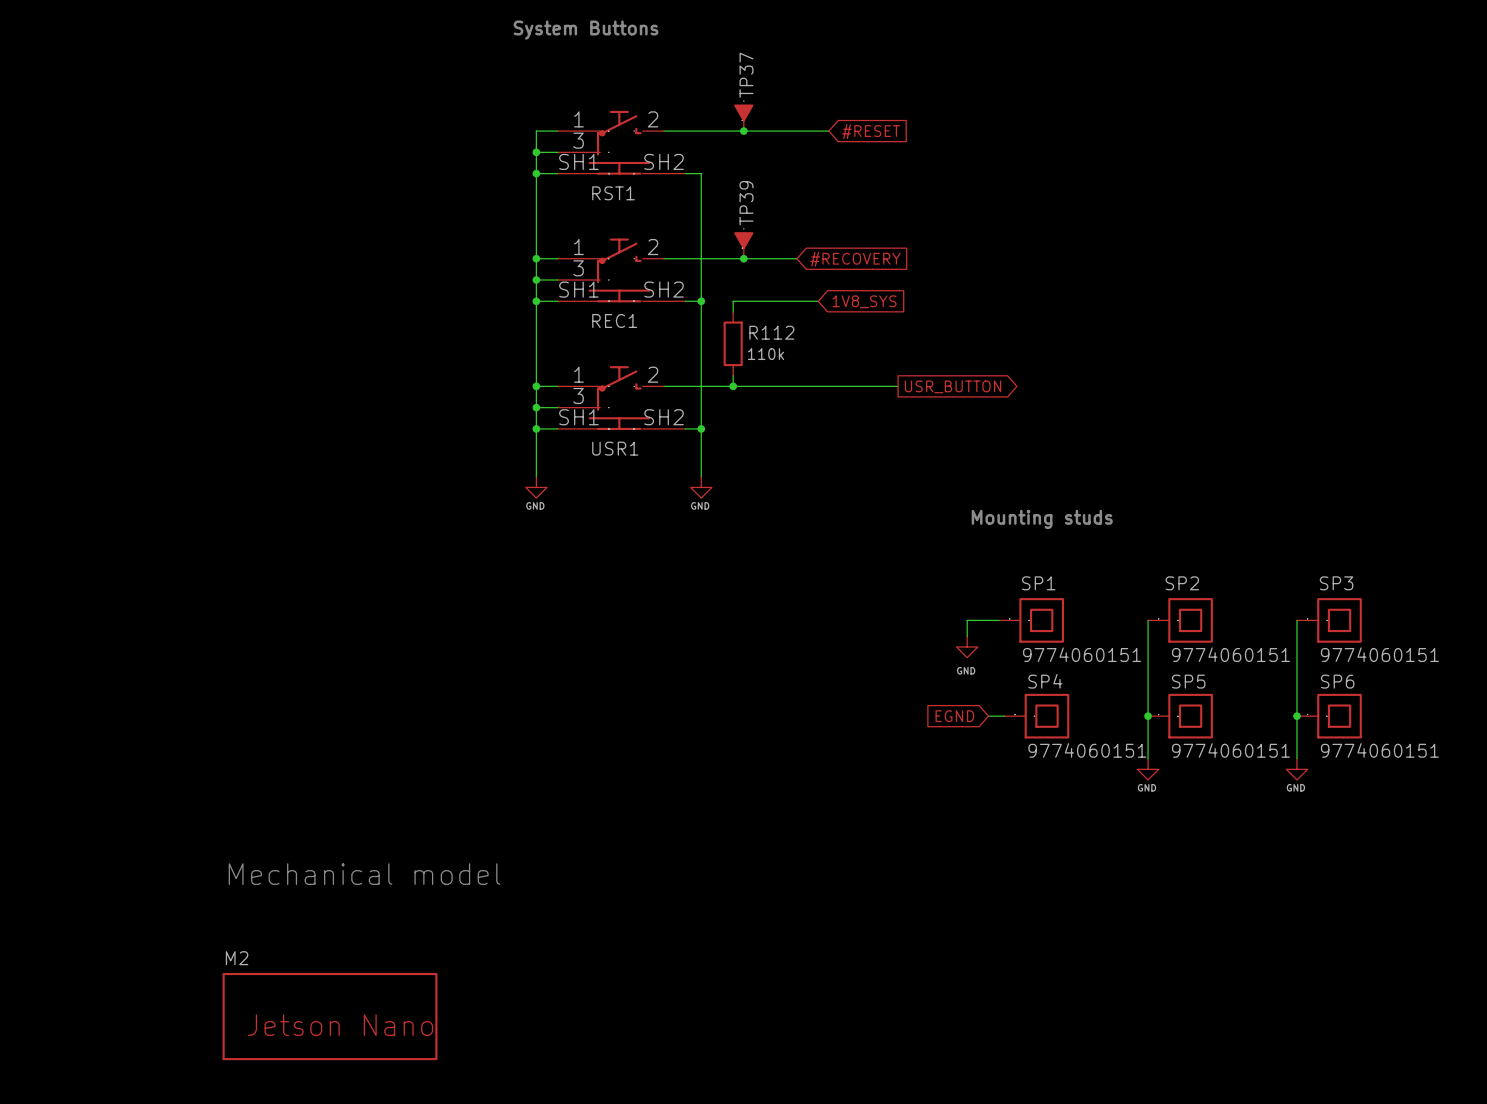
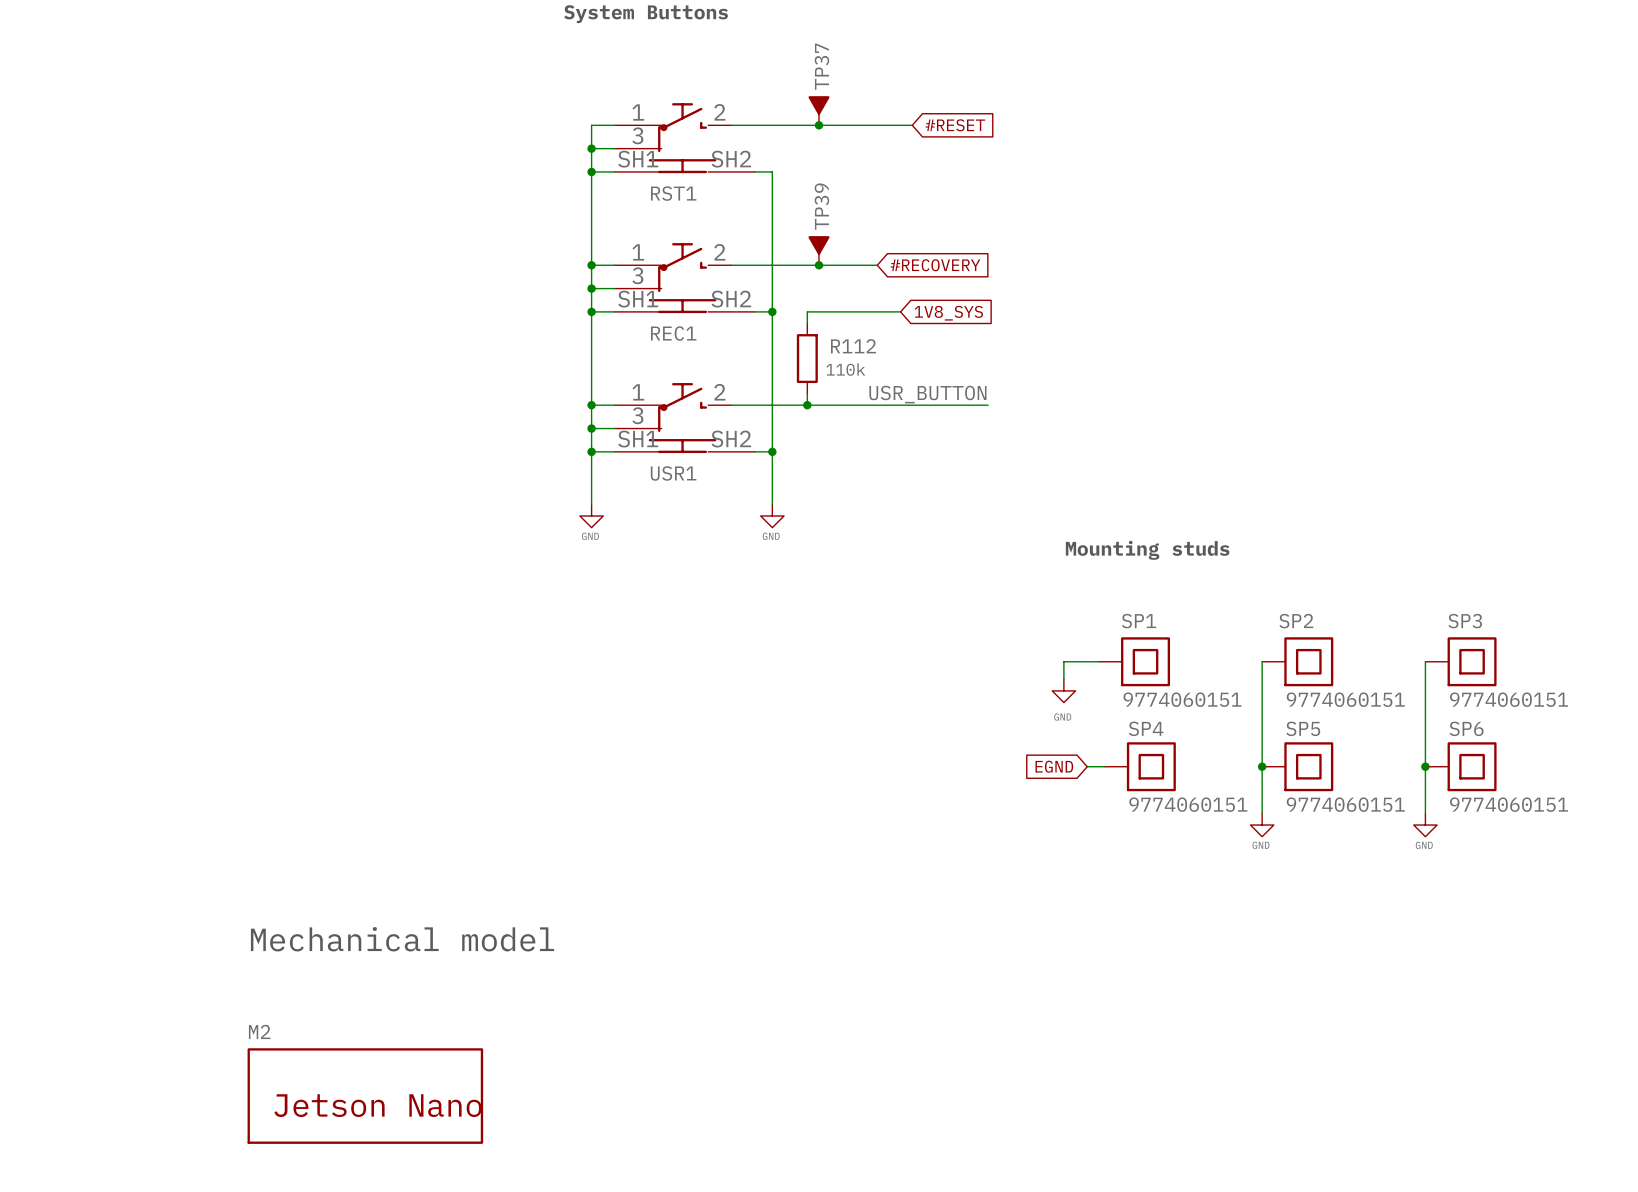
label: none -> USR_BUTTON (927, 394)
global label: USR_BUTTON (953, 386) -> none

